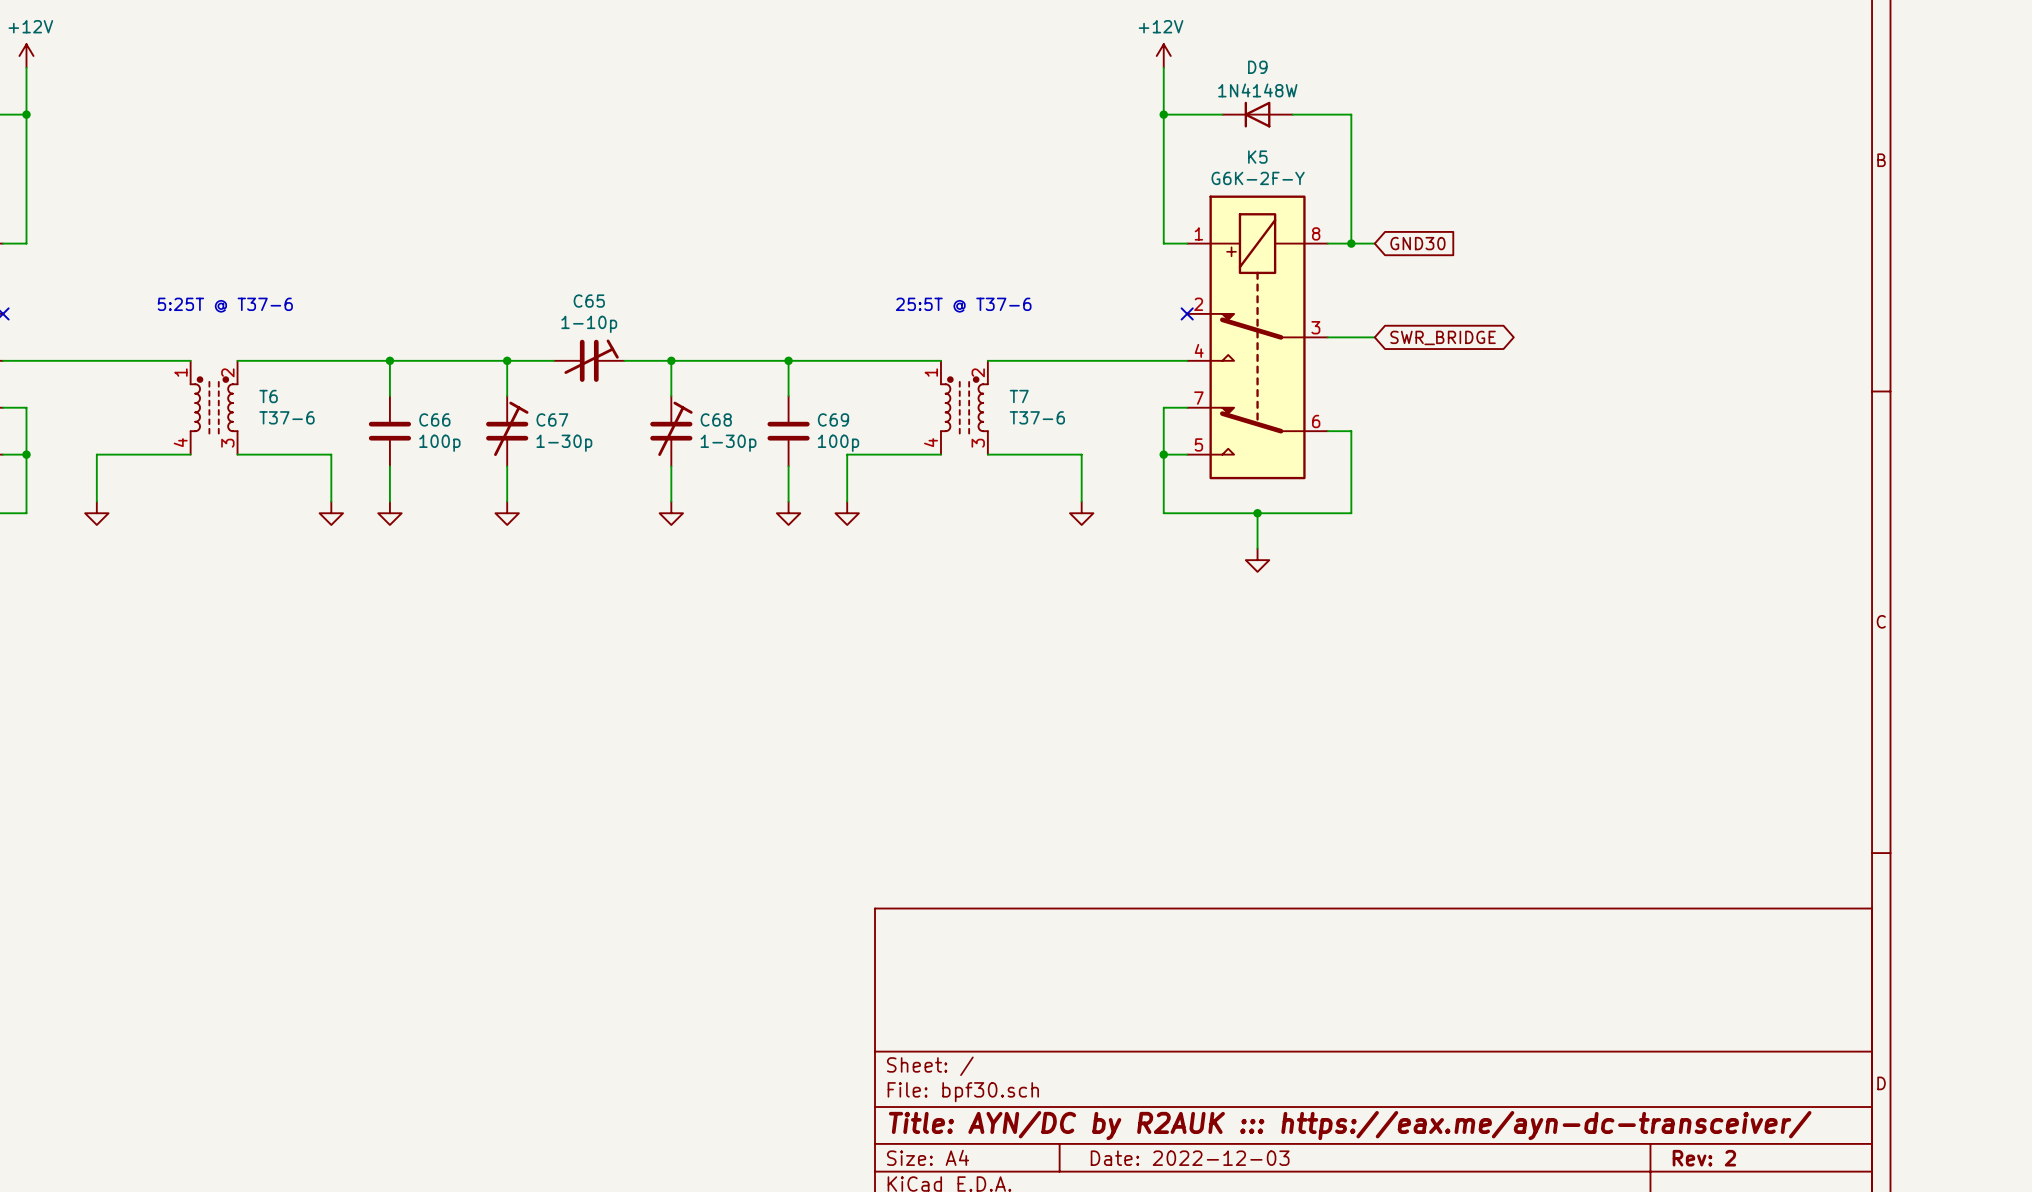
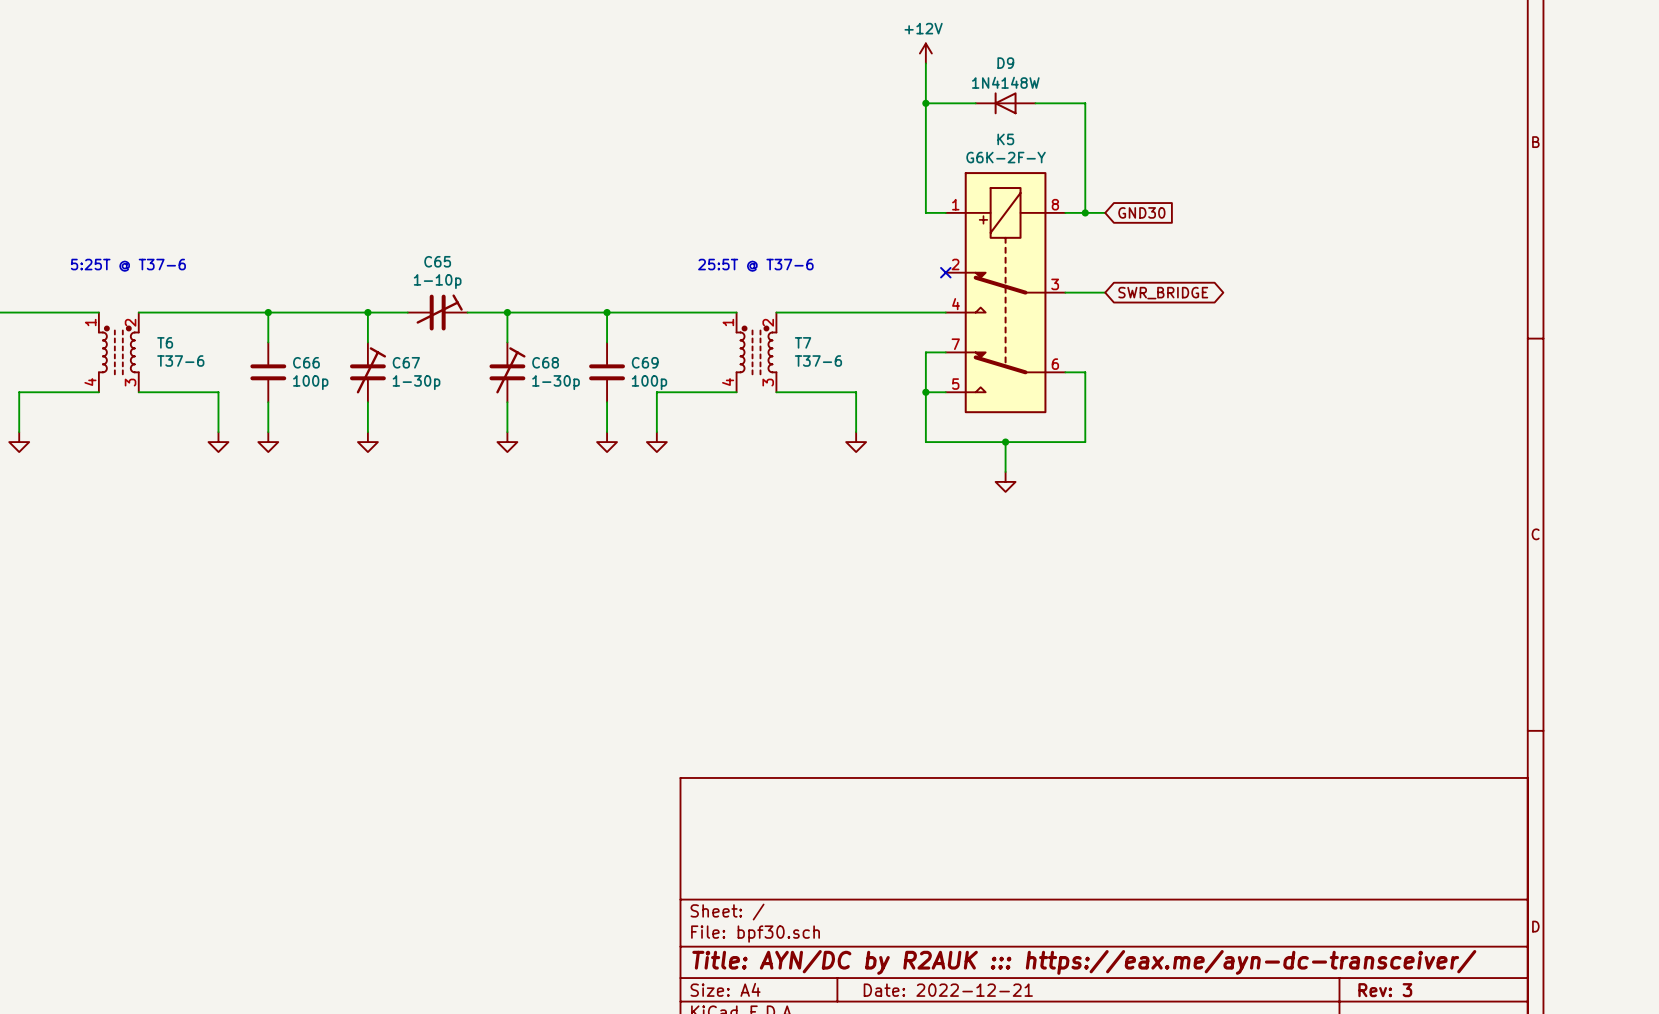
title block: Date: 2022-12-03 (1190, 1158) -> Date: 2022-12-21 (948, 990)
title block: Rev: 2 (1704, 1158) -> Rev: 3 (1385, 990)

